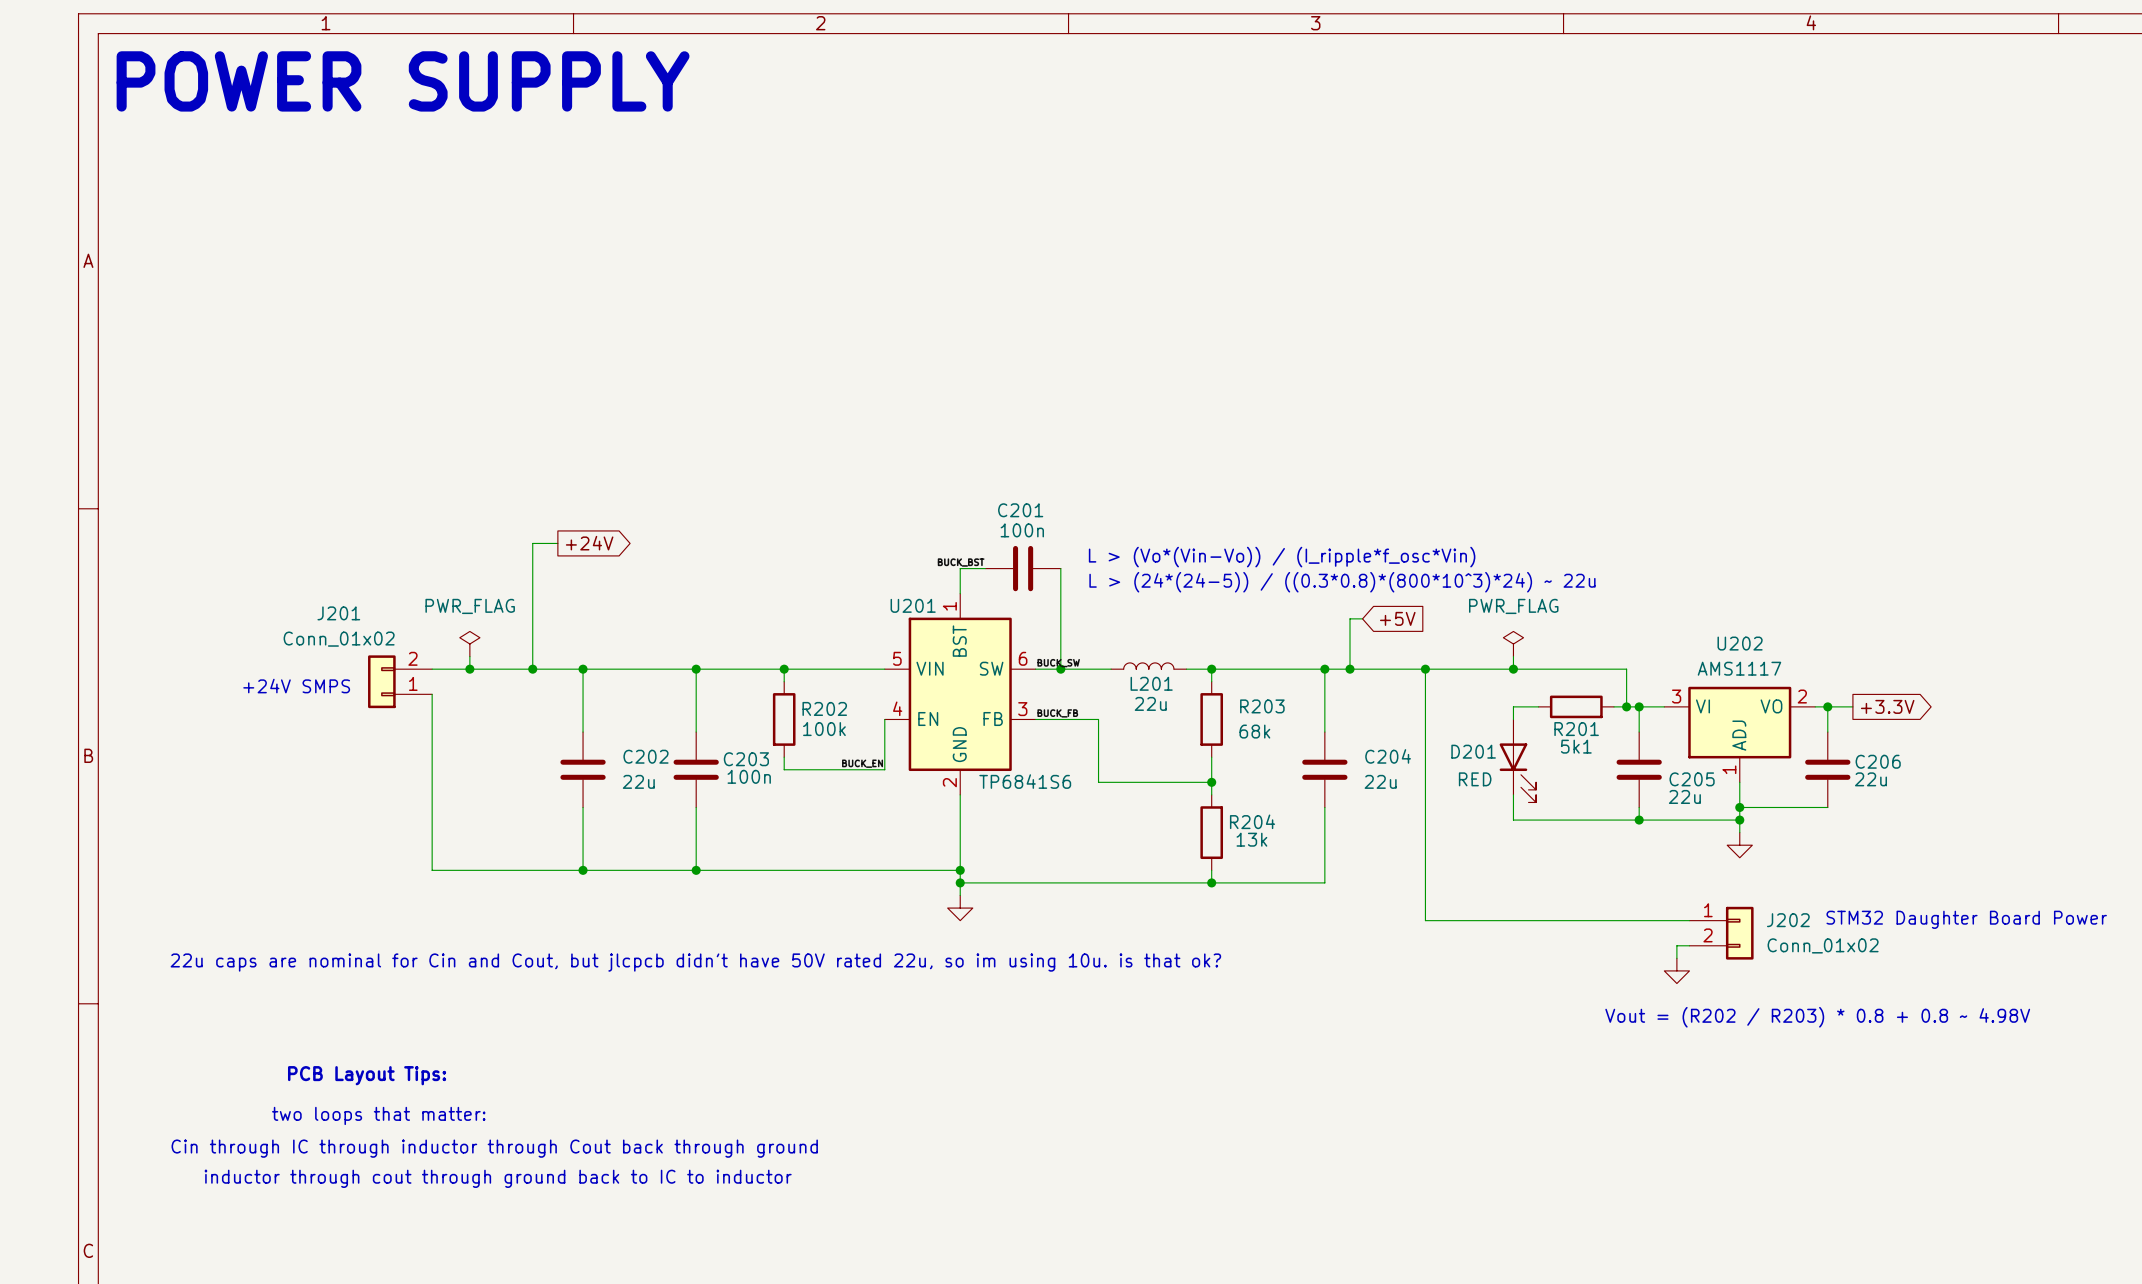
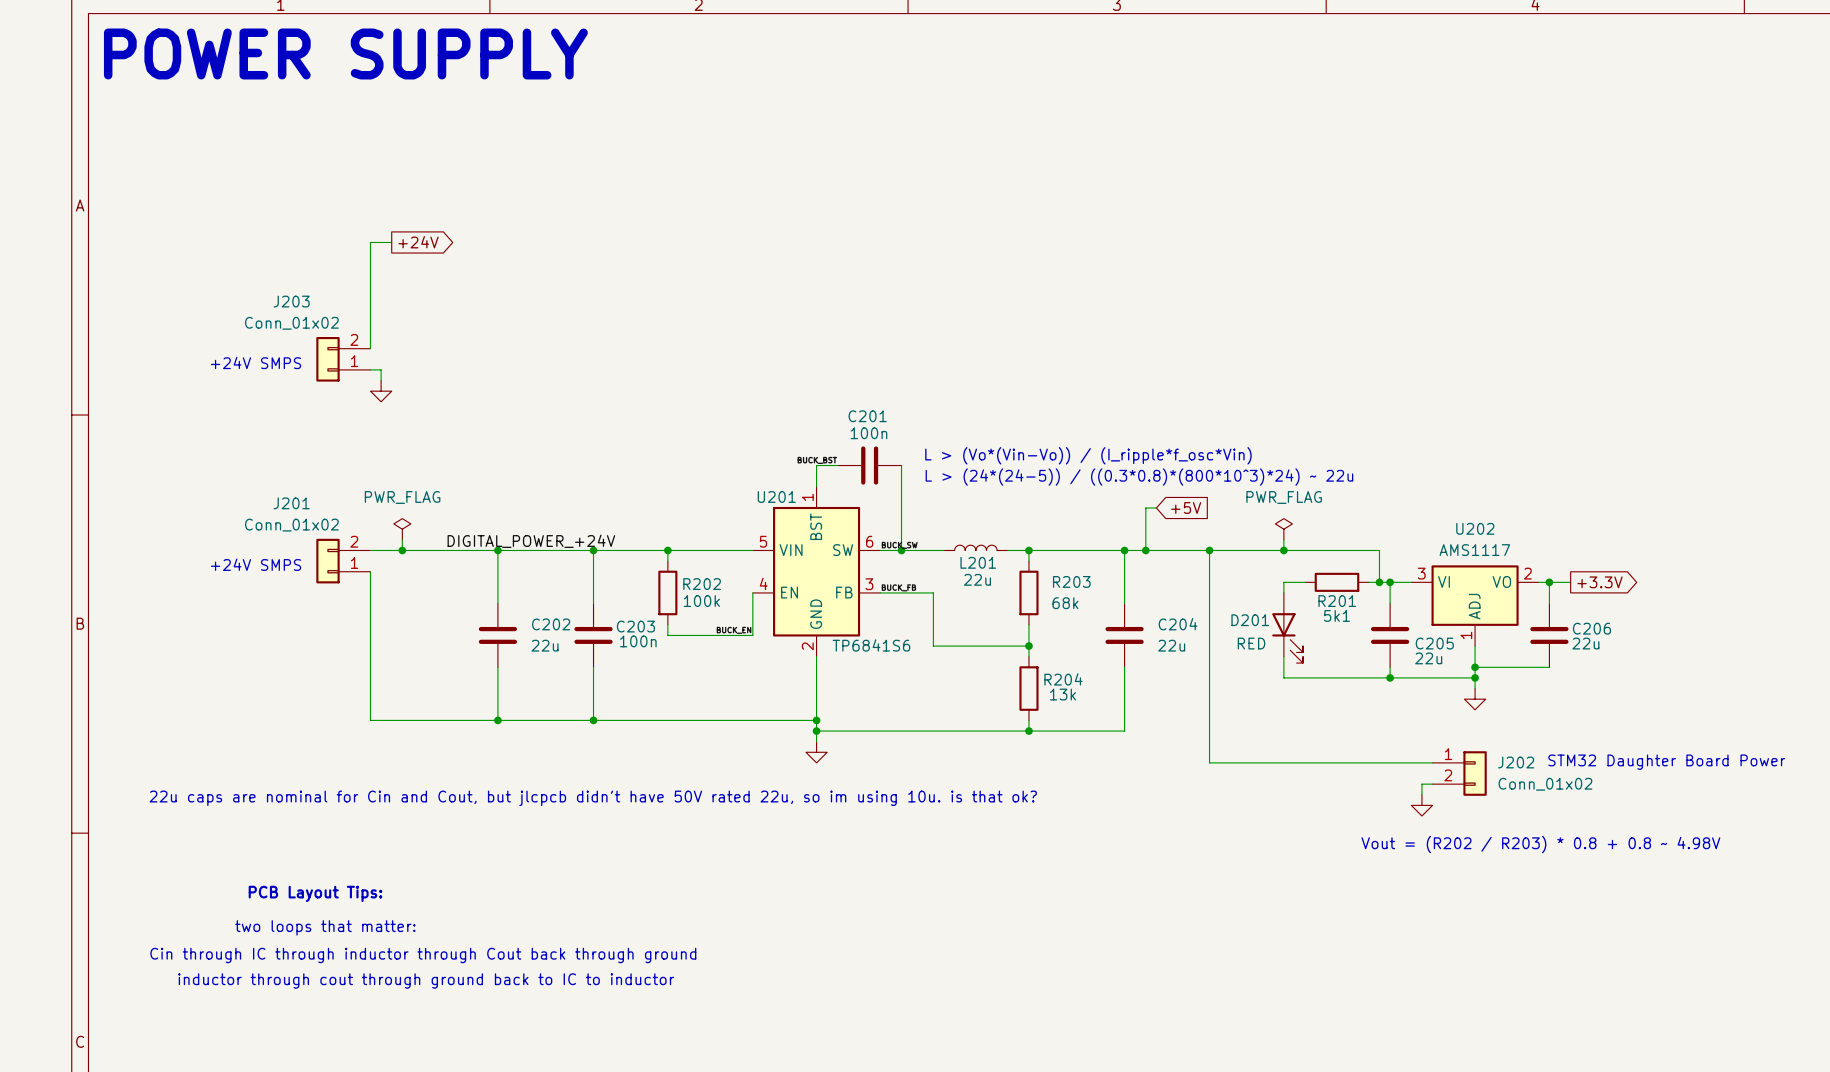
wire: none -> (391, 242) (370, 242) (370, 348)
global label: none -> +24V (418, 242)
J203: none -> Conn_01x02 (343, 359)
text: none -> +24V SMPS (256, 362)
wire: none -> (370, 369) (381, 369) (381, 380)
power symbol: none -> (381, 391)
wire: (557, 543) (532, 543) (532, 669) -> none
global label: +24V (589, 543) -> none
label: none -> DIGITAL_POWER_+24V (531, 541)
junction: (532, 669) -> none

